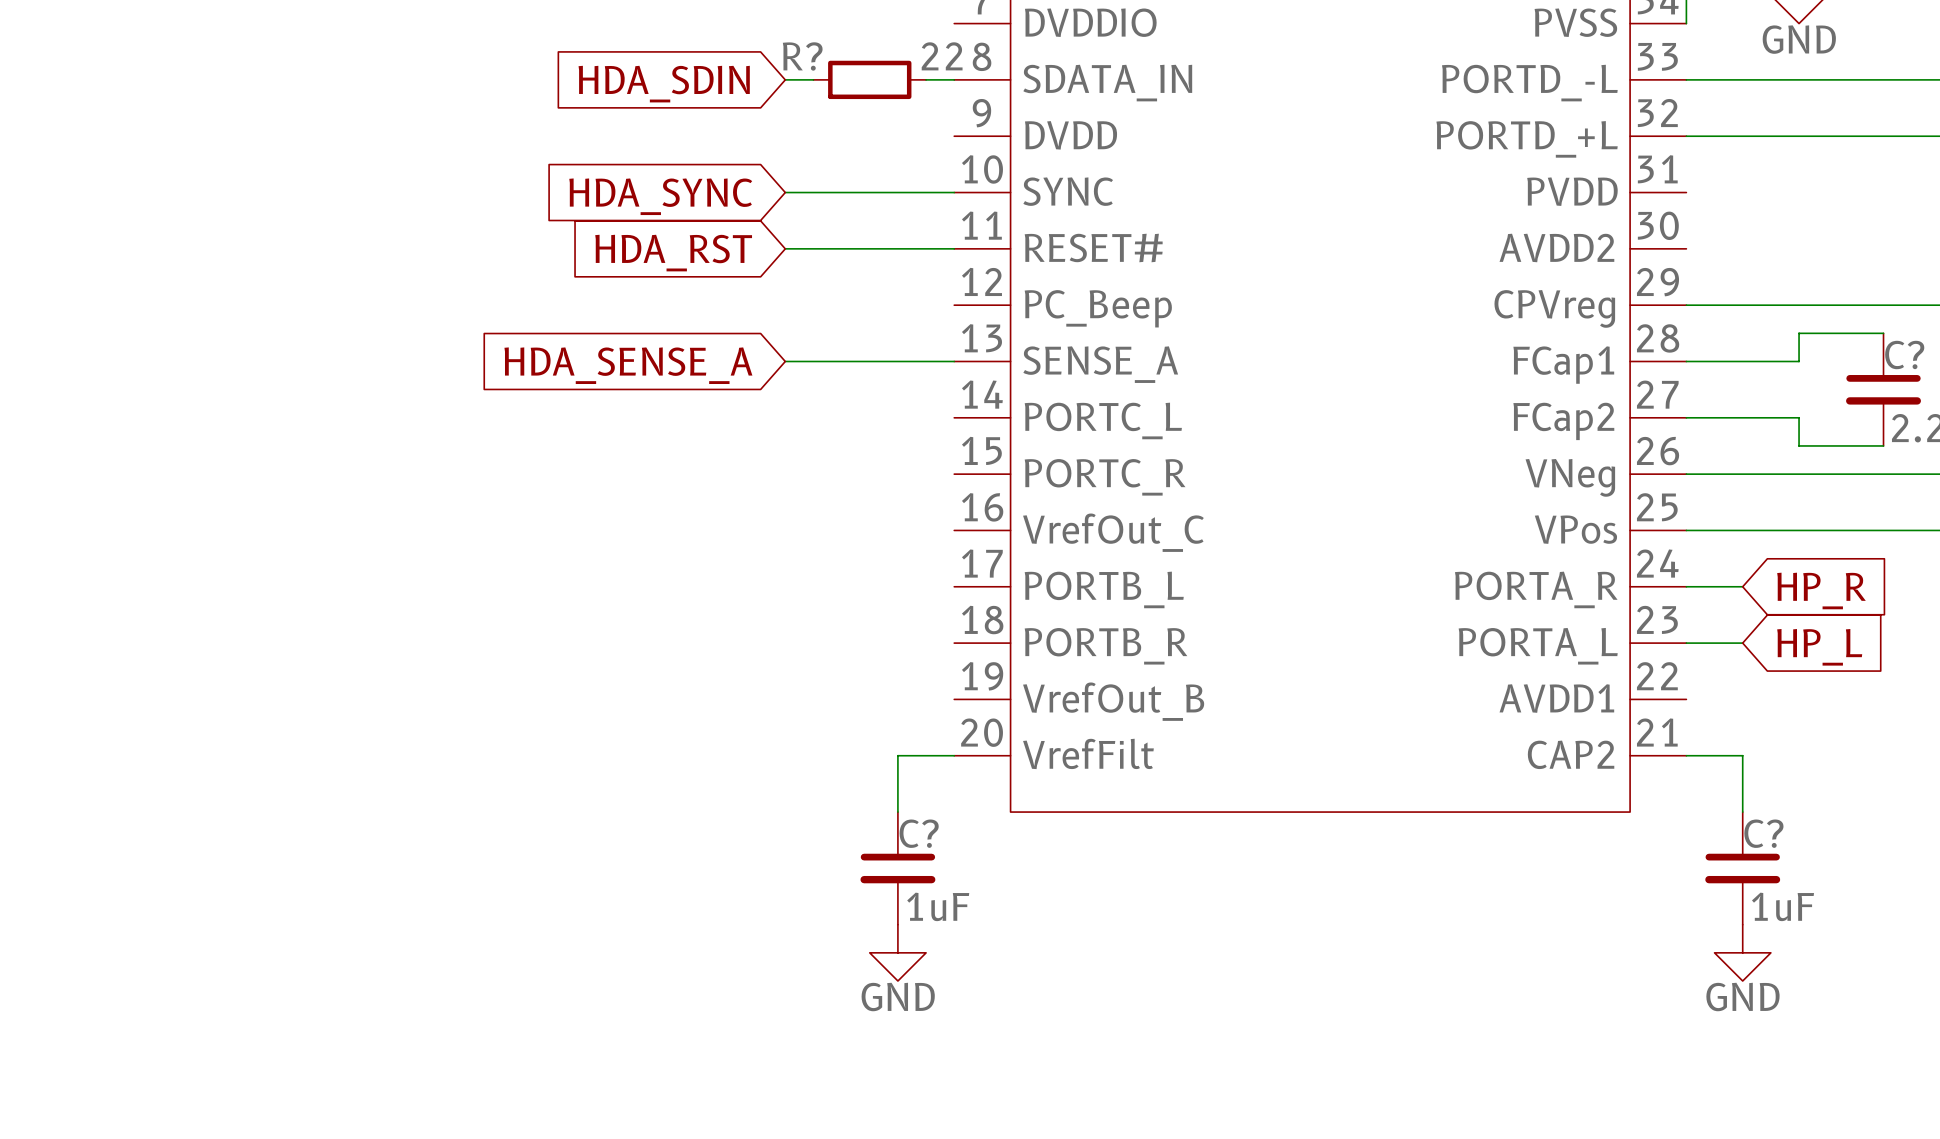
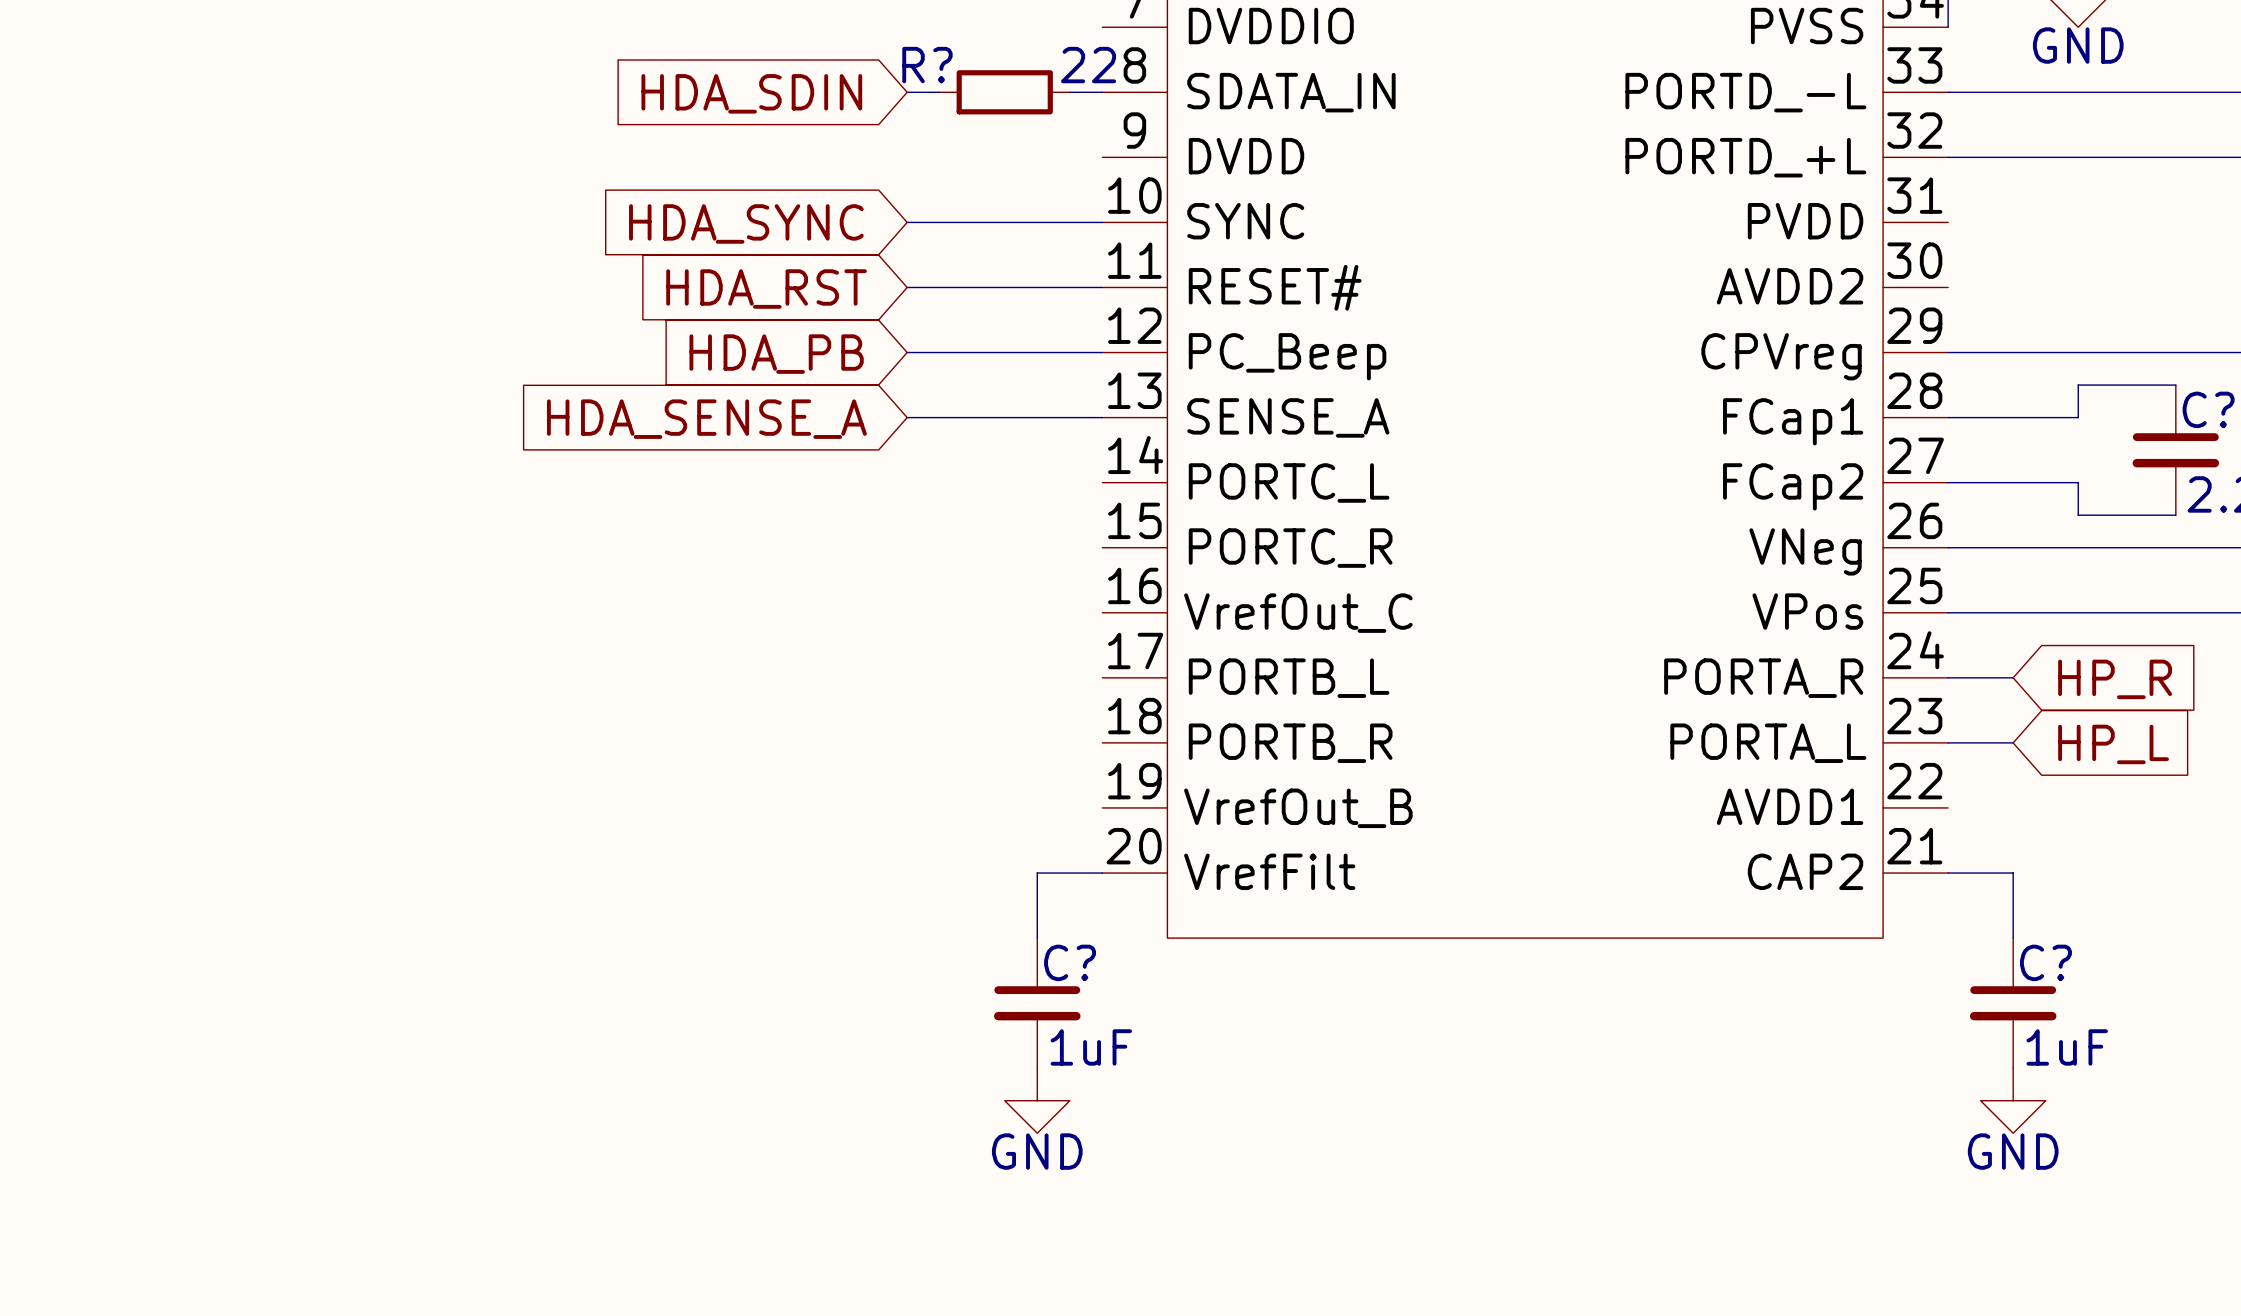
wire: none -> (907, 352) (1102, 352)
global label: none -> HDA_PB (776, 354)

